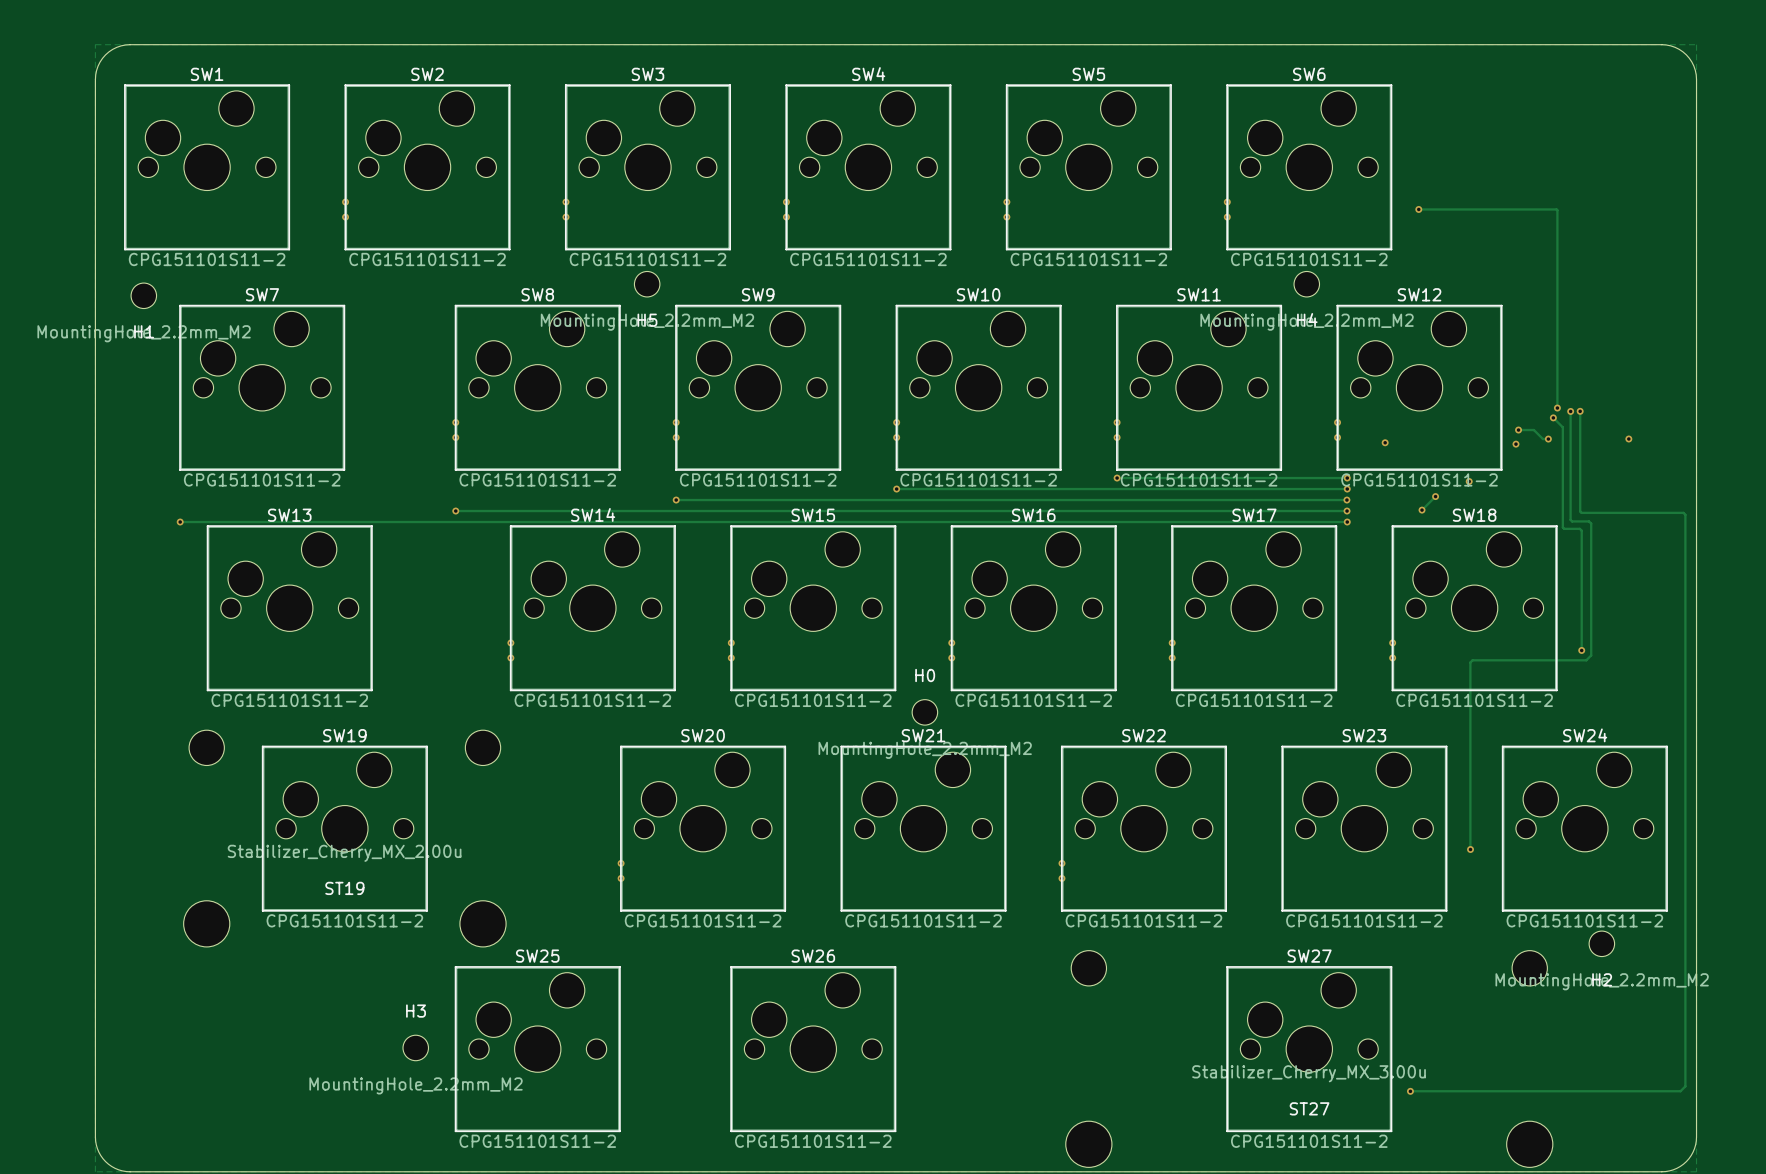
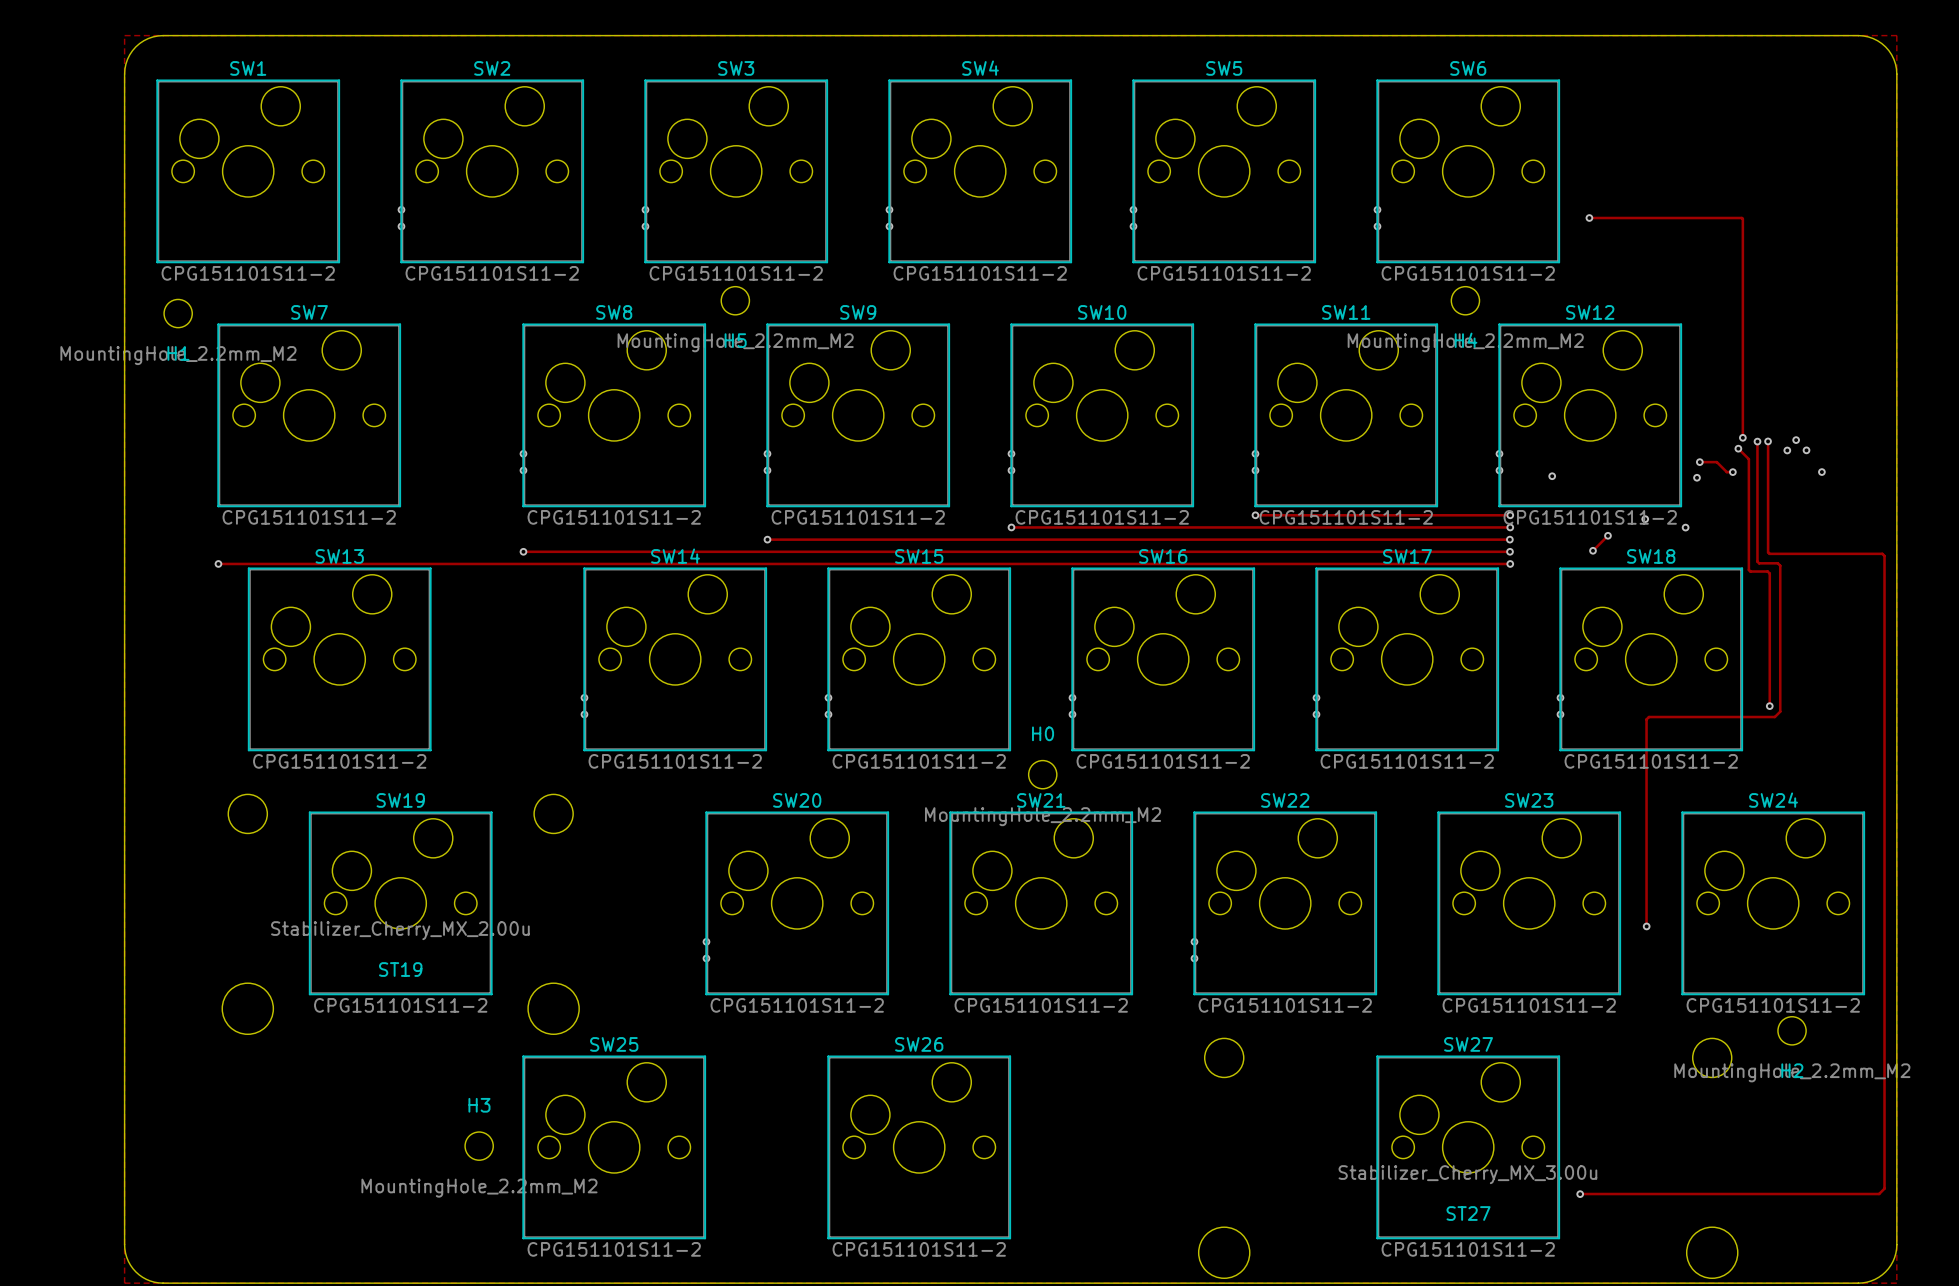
via: none -> (1796, 440)
via: none -> (1787, 450)
via: none -> (1806, 450)
via: none -> (1685, 527)

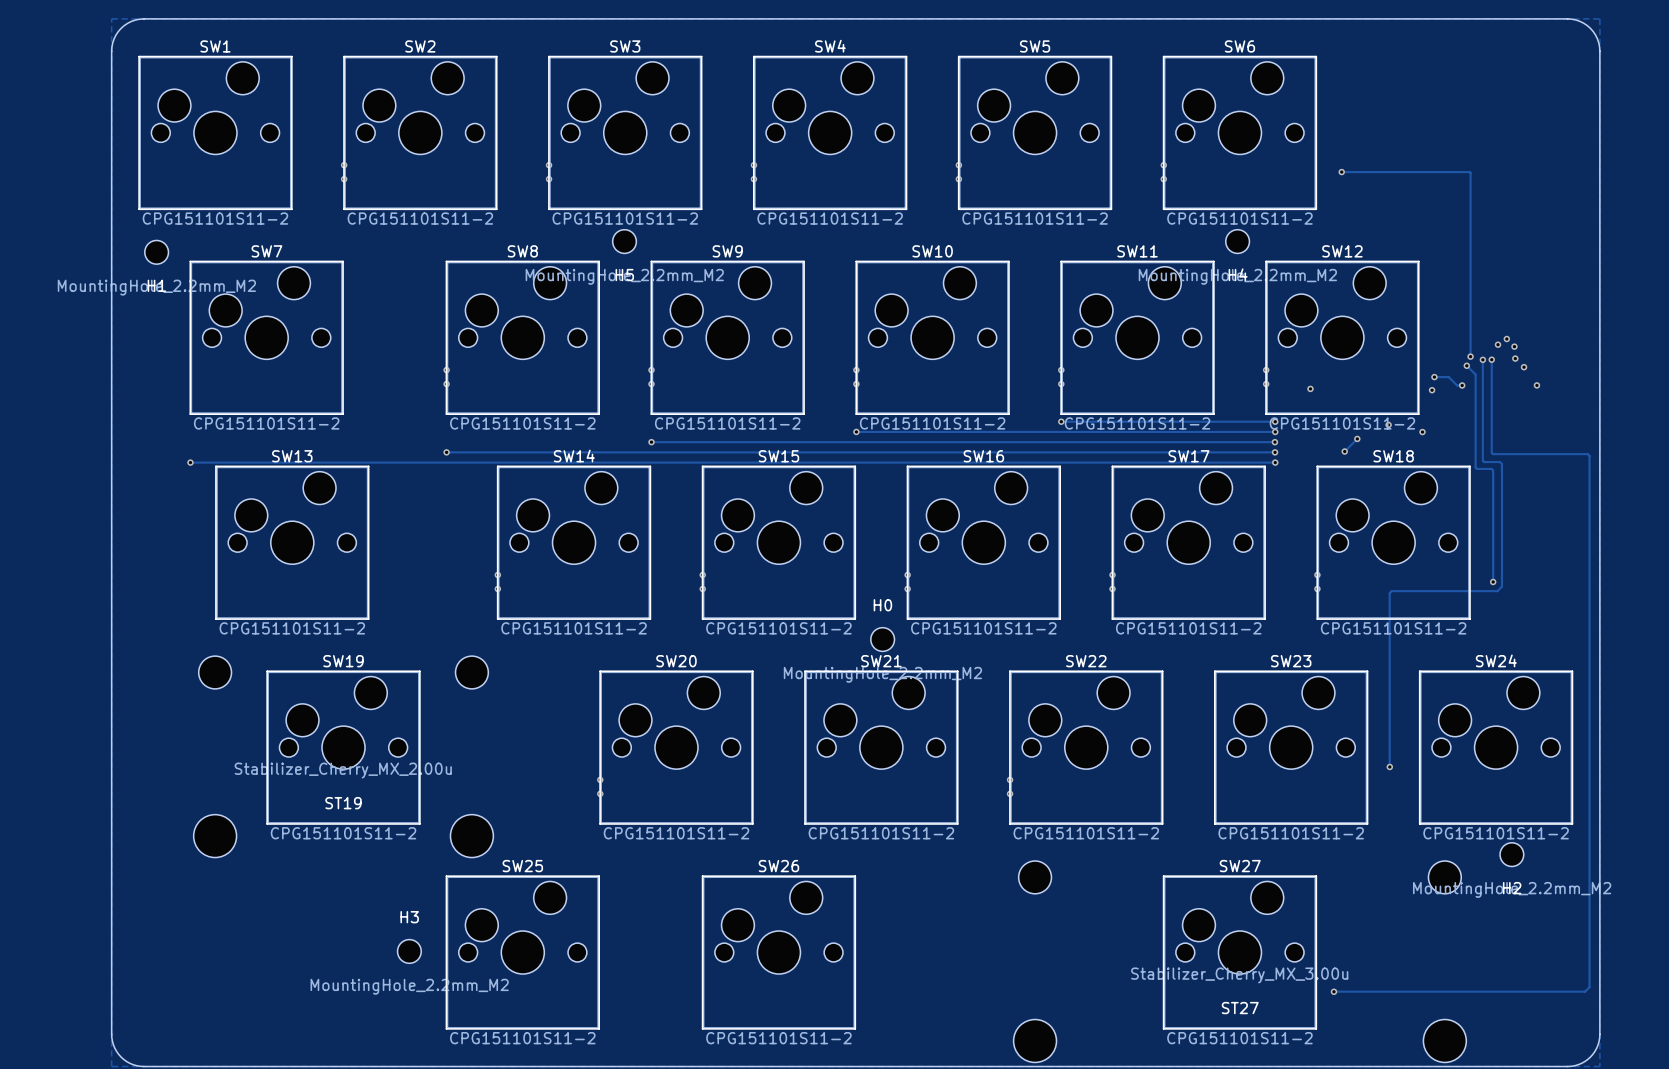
via: none -> (1506, 339)
via: none -> (1498, 344)
via: none -> (1514, 346)
via: (1787, 450) -> none

